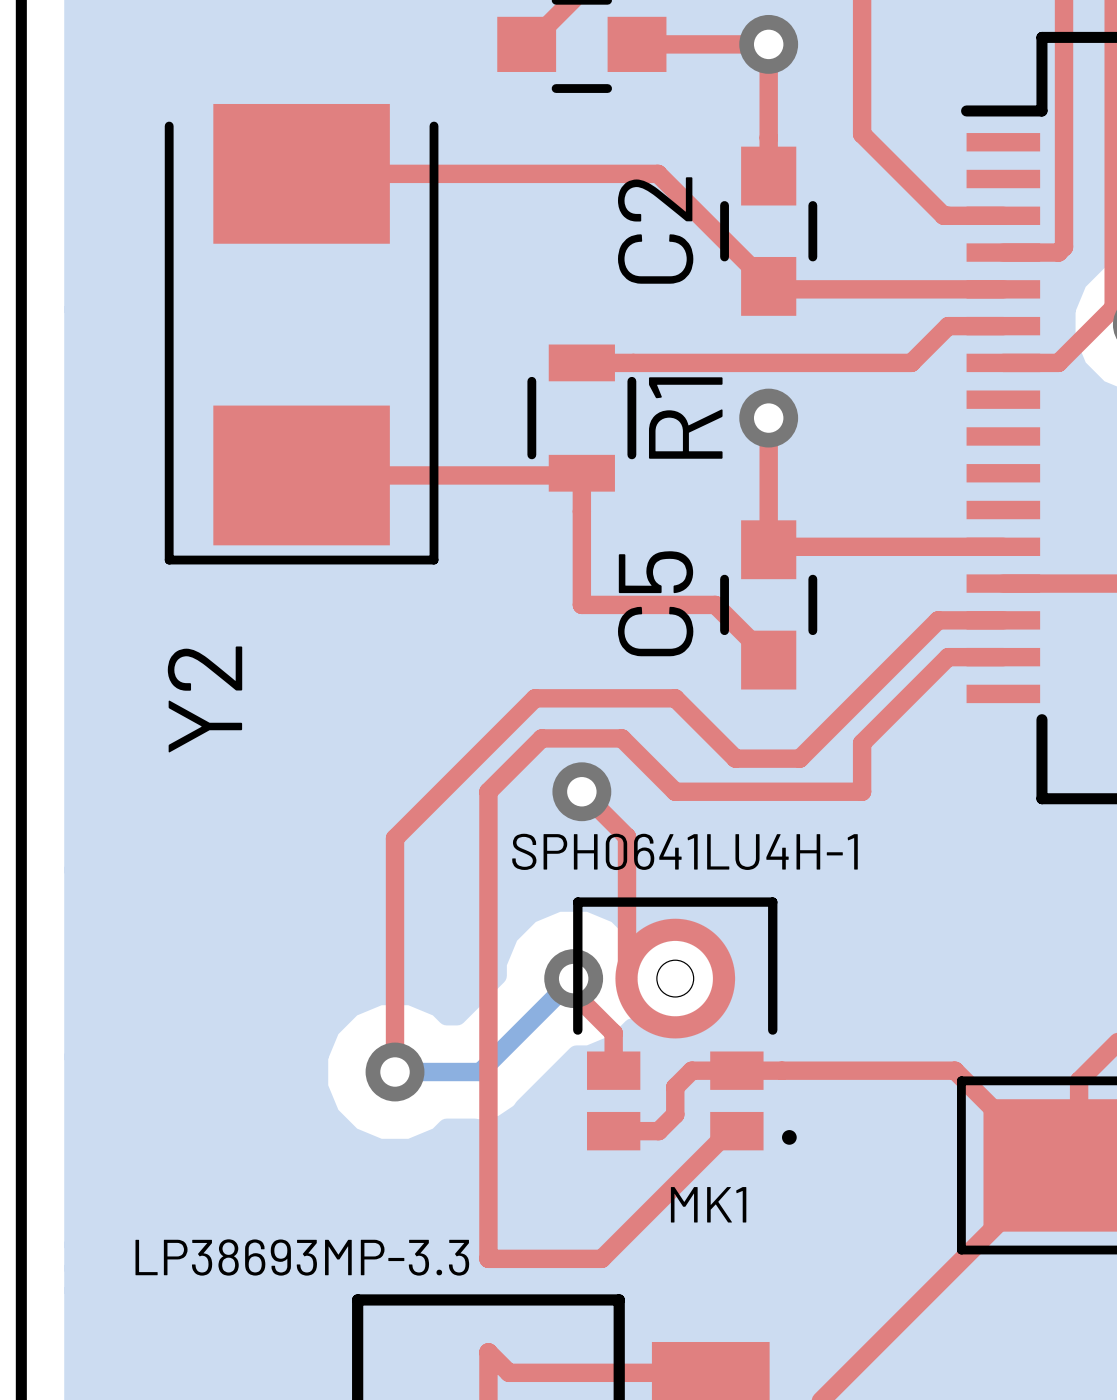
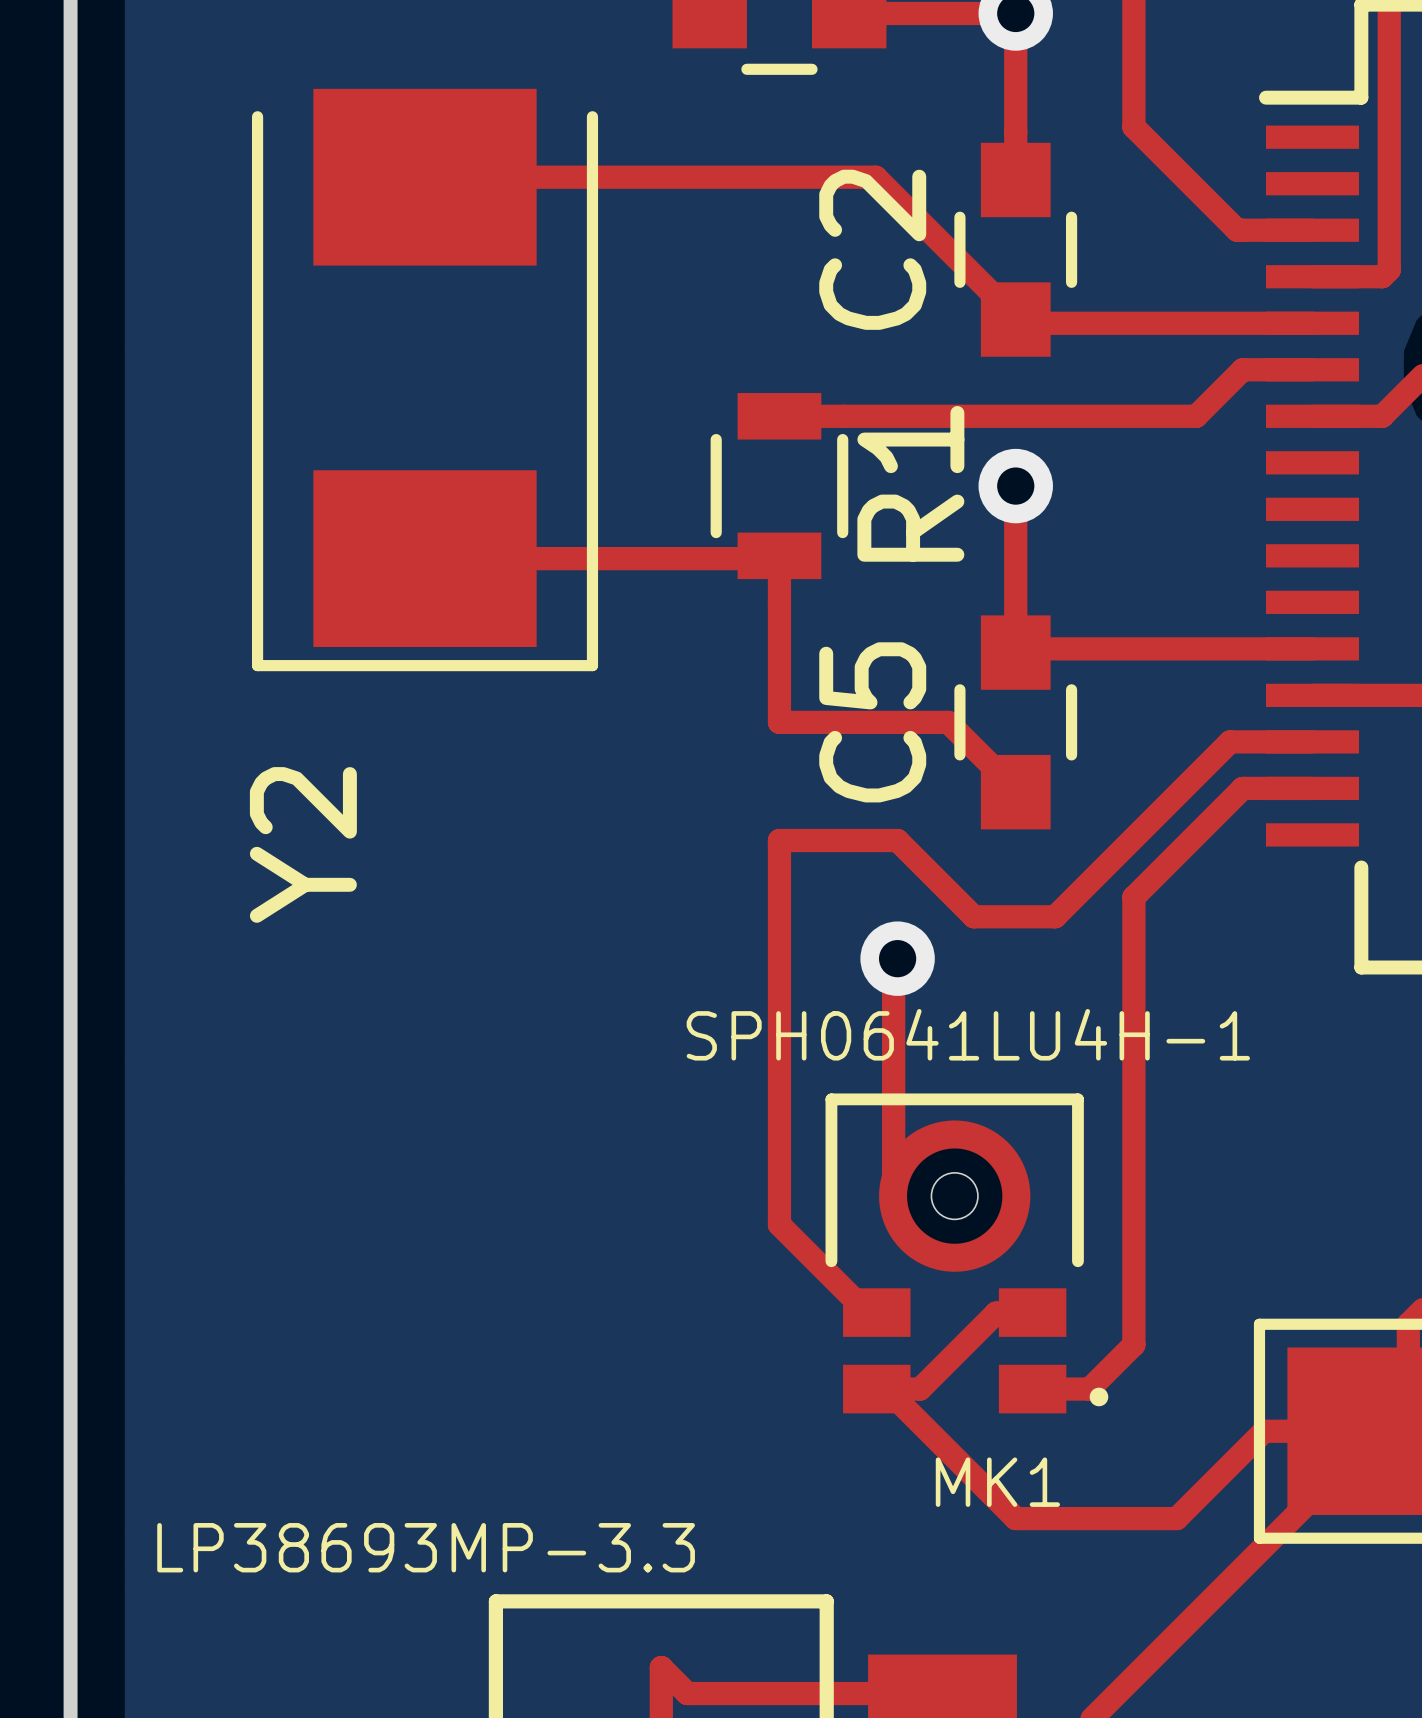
top track: (581, 698) (535, 698) (395, 838) (395, 1072) -> (779, 840) (779, 1205)
top track: (581, 791) (627, 836) (627, 979) -> none
via position: (581, 791) -> (897, 958)
top track: none -> (897, 958) (893, 962) (893, 1197)
top track: (862, 791) (675, 791) (621, 738) (541, 738) (488, 791) (488, 1258) (601, 1258) (729, 1131) (736, 1131) -> (1133, 958) (1133, 1344) (1089, 1389) (1032, 1389)
bottom track: (573, 978) (480, 1072) (395, 1072) -> none
via: (573, 978) -> none
top track: (581, 1001) (613, 1033) (613, 1070) -> (779, 1224) (867, 1312) (876, 1312)
MK1 position: (684, 1023) -> (966, 1253)
via: (395, 1072) -> none
top track: none -> (1032, 1313) (996, 1313) (920, 1389) (876, 1389)
top track: (613, 1131) (658, 1131) (675, 1114) (675, 1087) (691, 1070) (954, 1070) (1049, 1165) -> (886, 1389) (1015, 1518) (1176, 1518) (1264, 1431) (1371, 1431)

